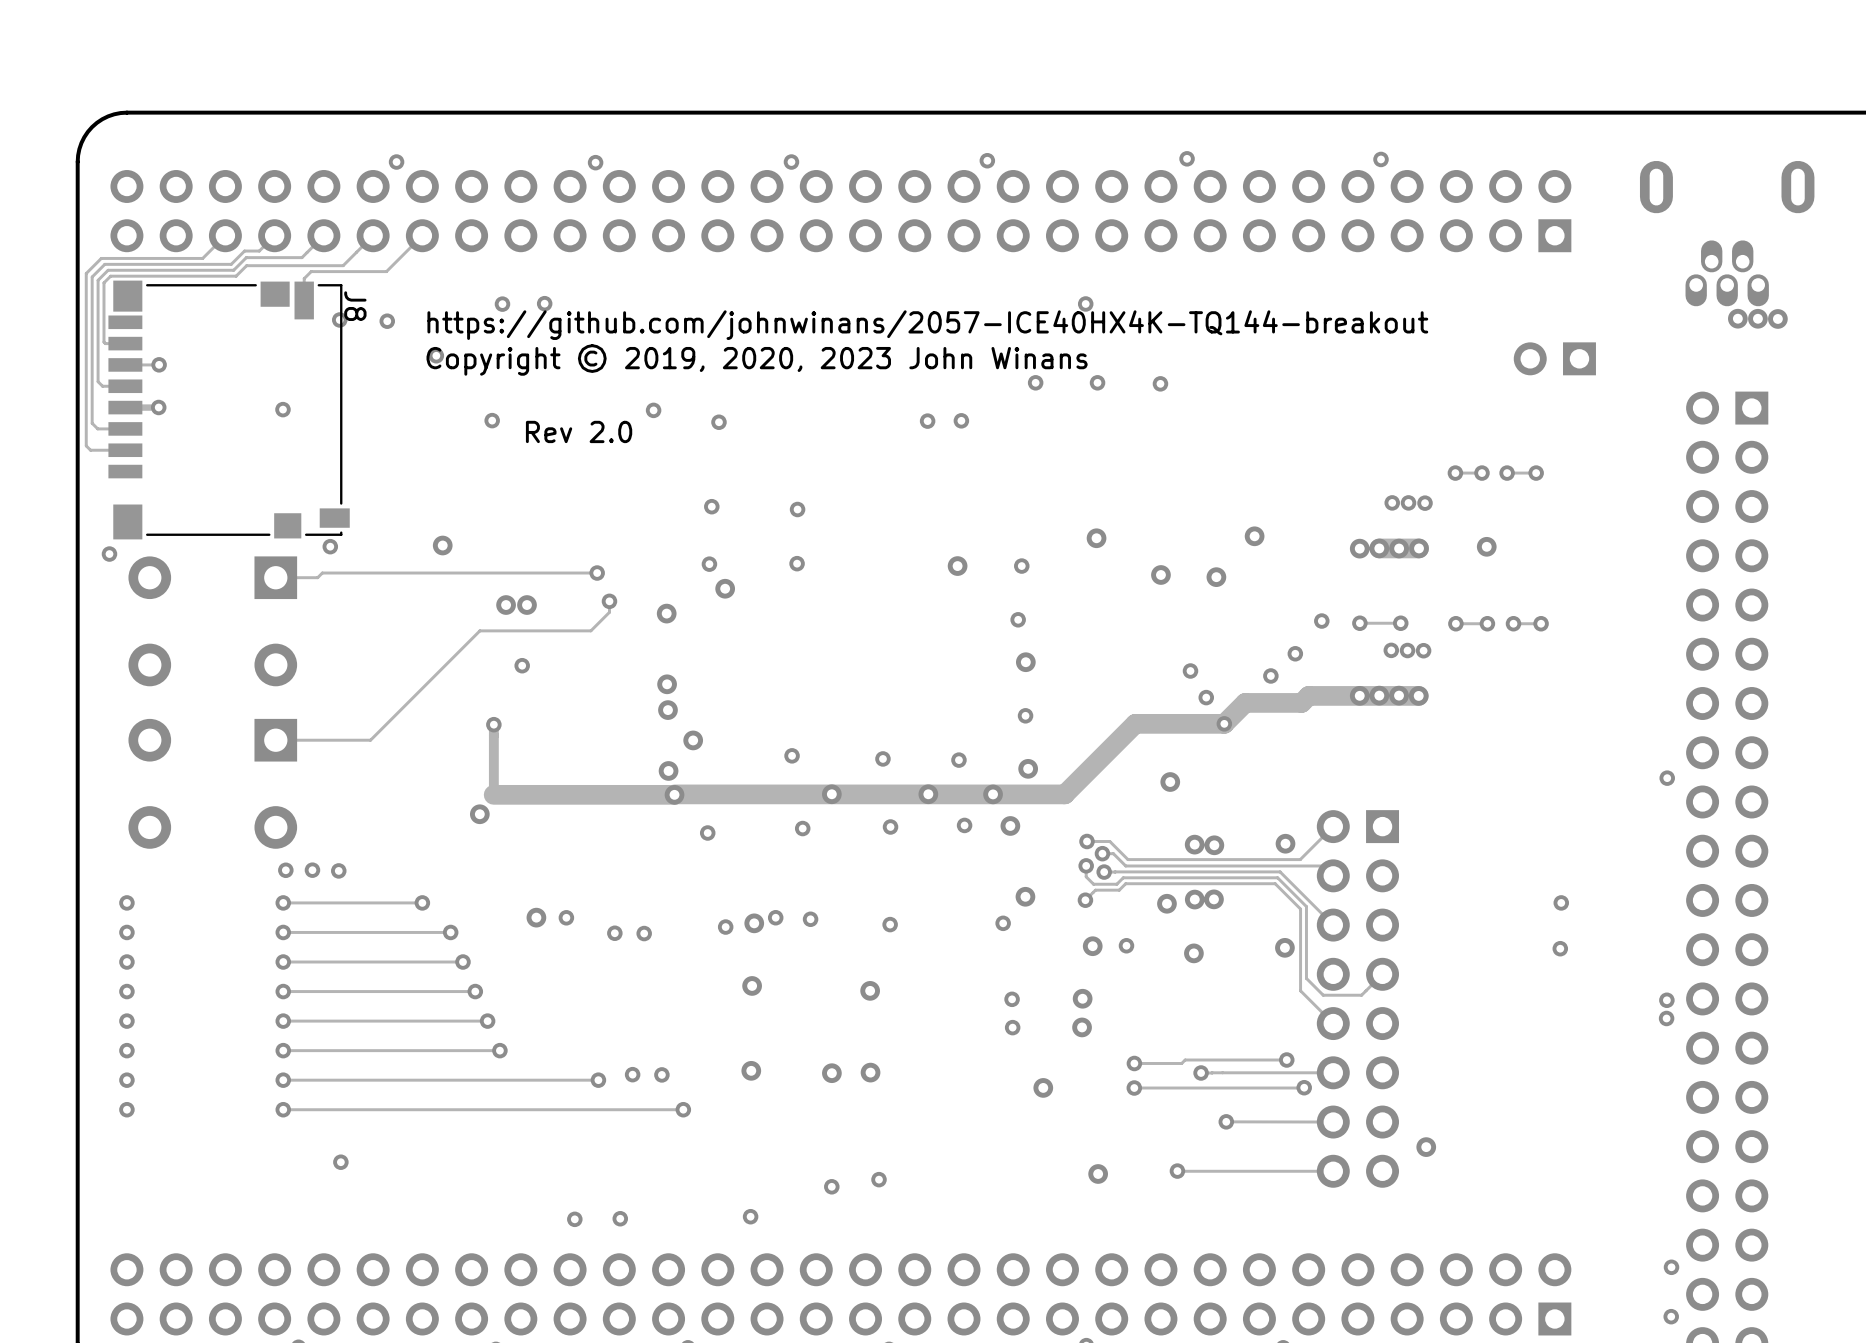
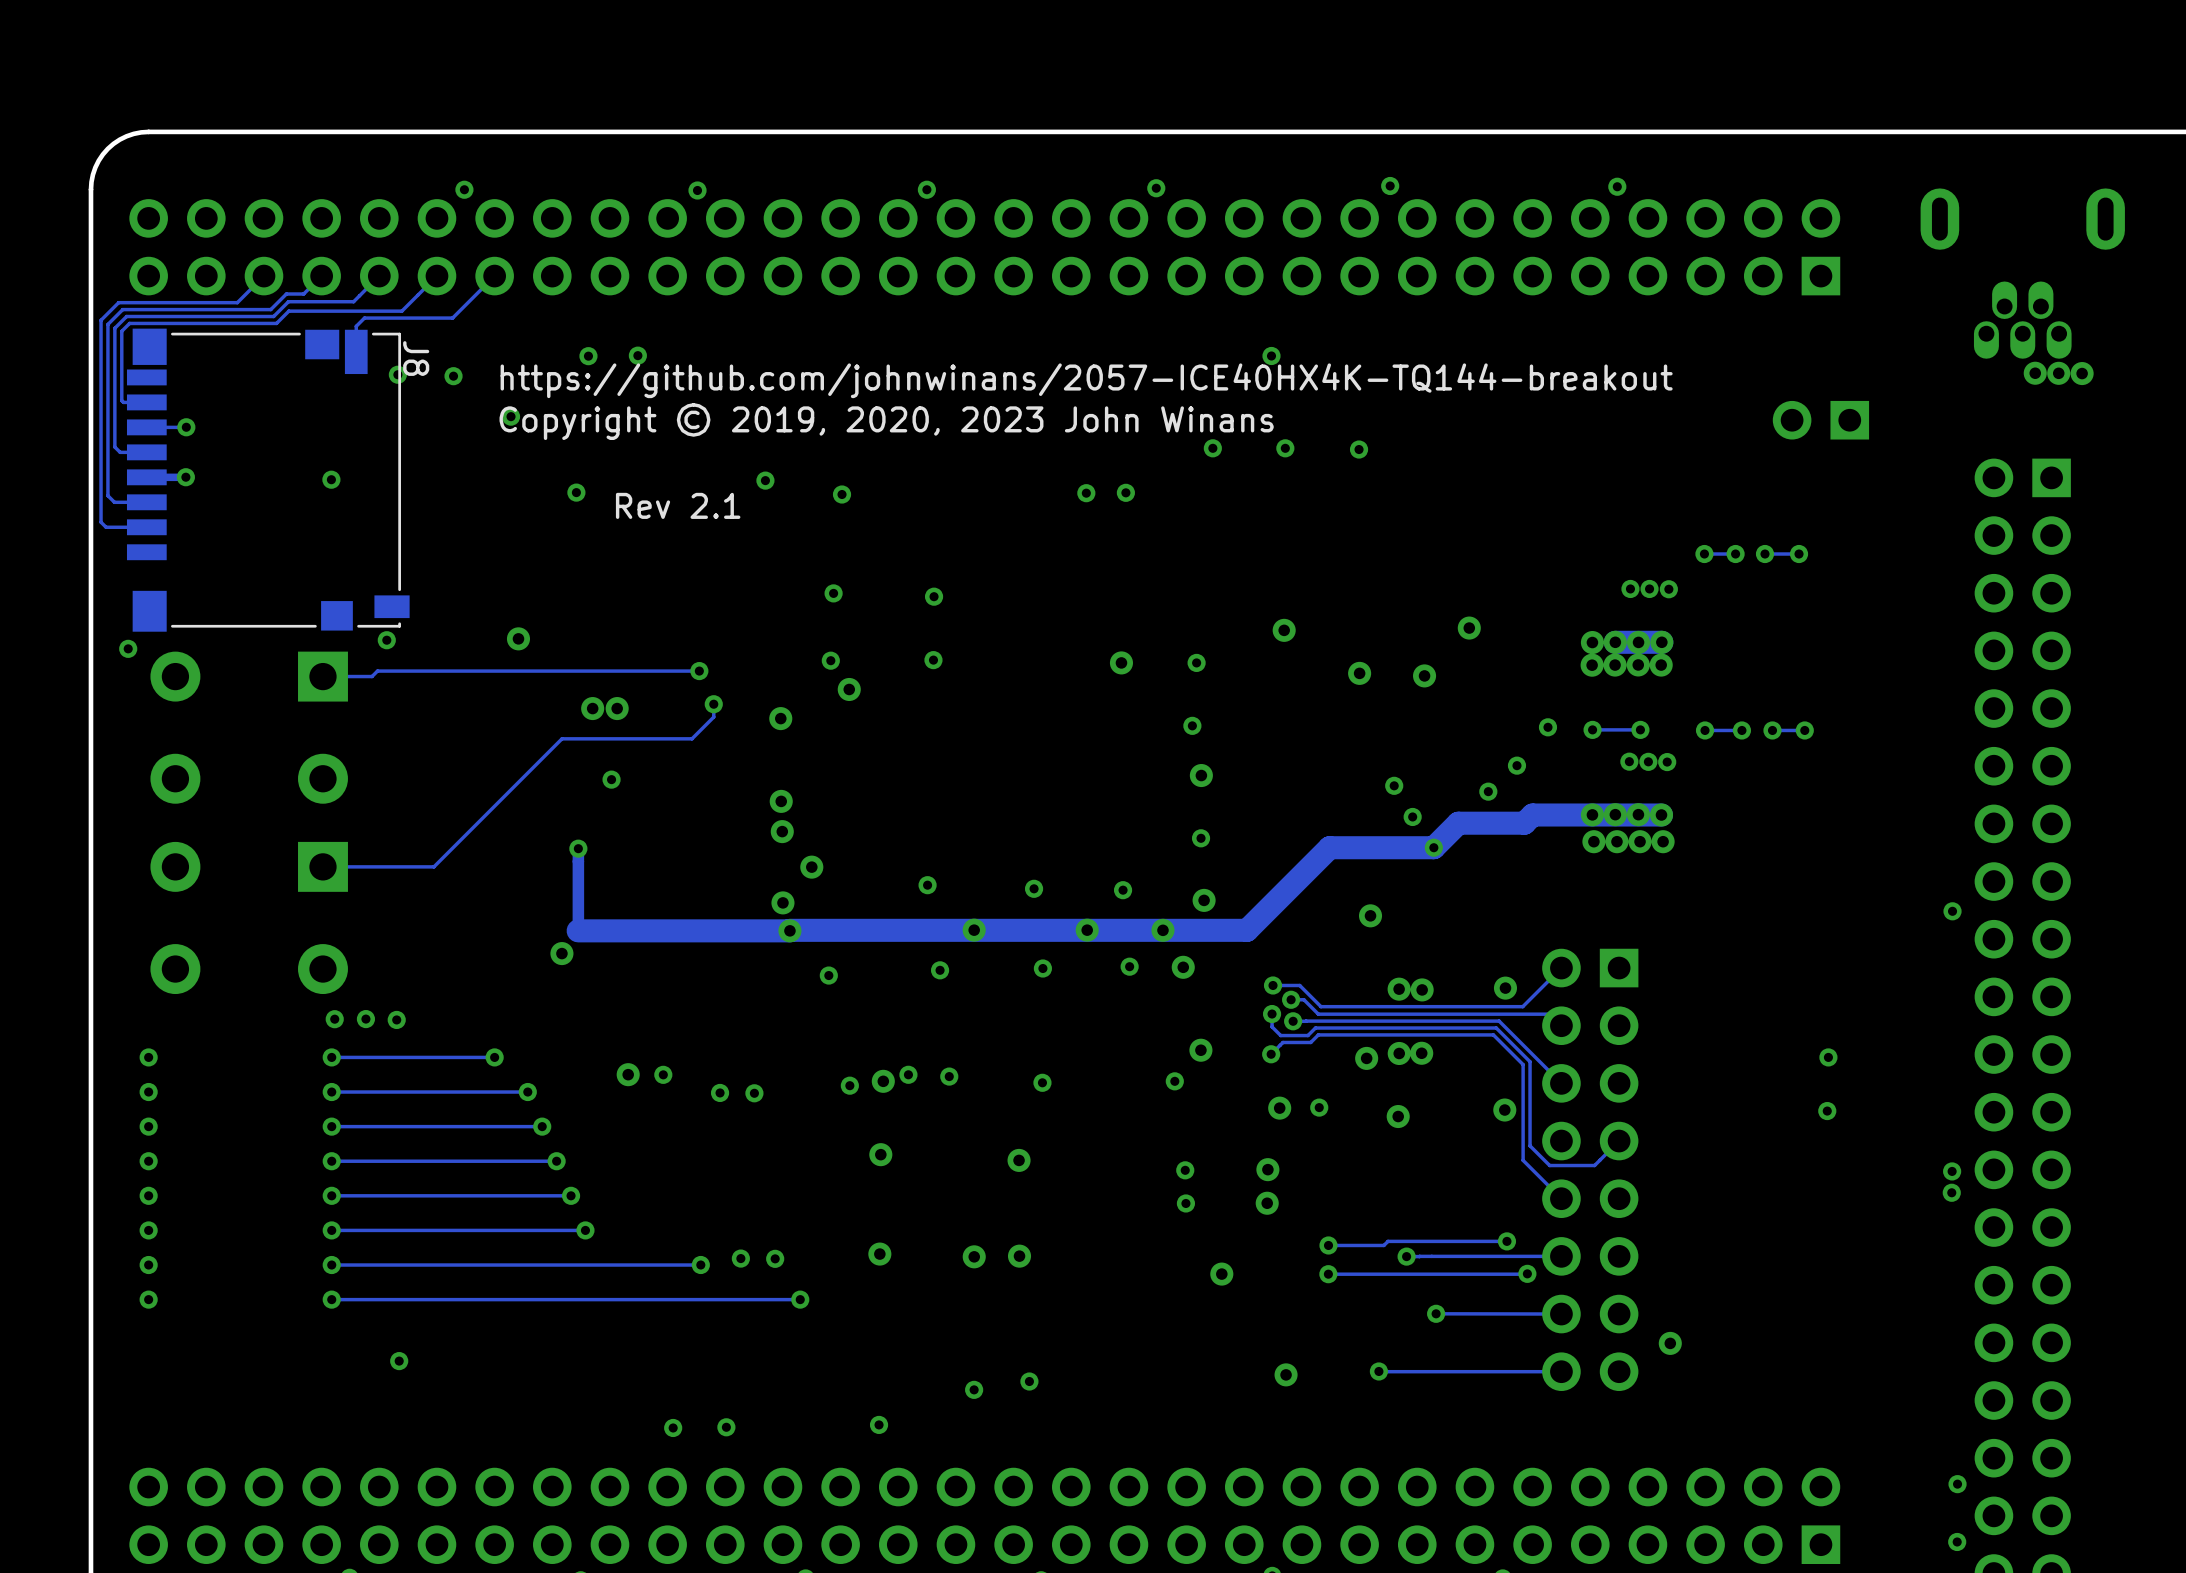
text: Rev 2.0 (579, 431) -> Rev 2.1 (678, 505)
via: (1486, 546) -> none
via: none -> (1592, 665)
via: none -> (1615, 665)
via: none -> (1638, 664)
via: none -> (1661, 665)
via: none -> (1593, 841)
via: none -> (1616, 841)
via: none -> (1640, 841)
via: none -> (1663, 841)

